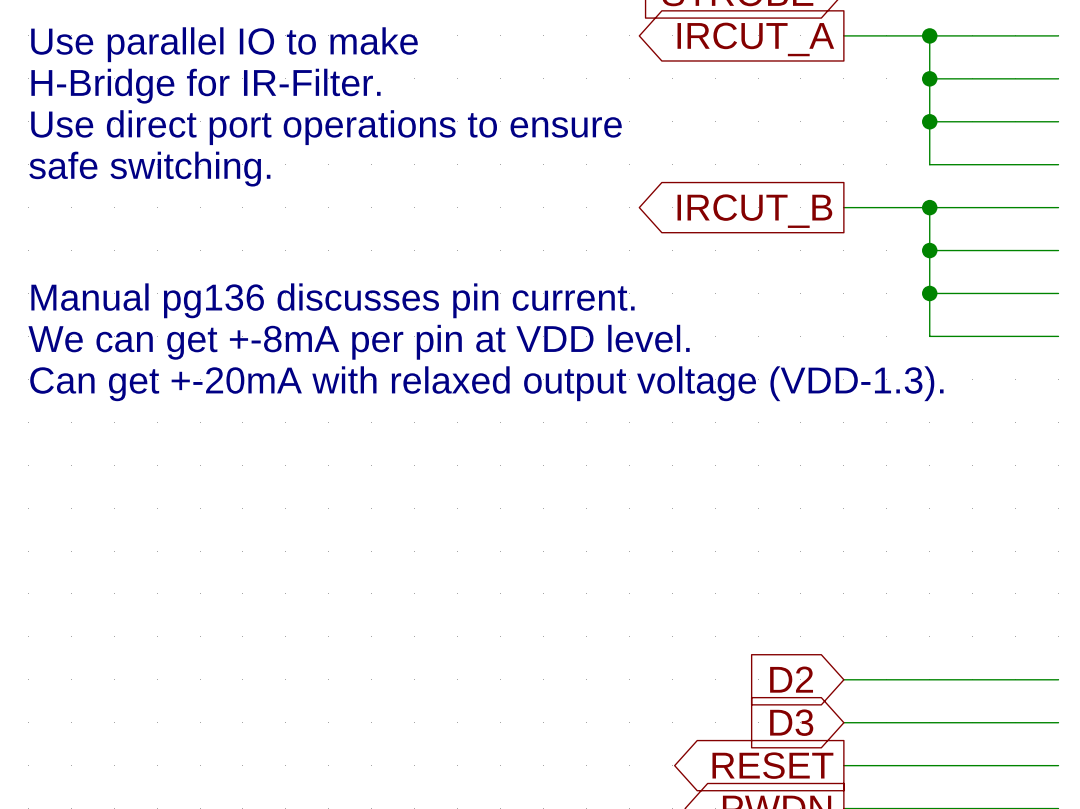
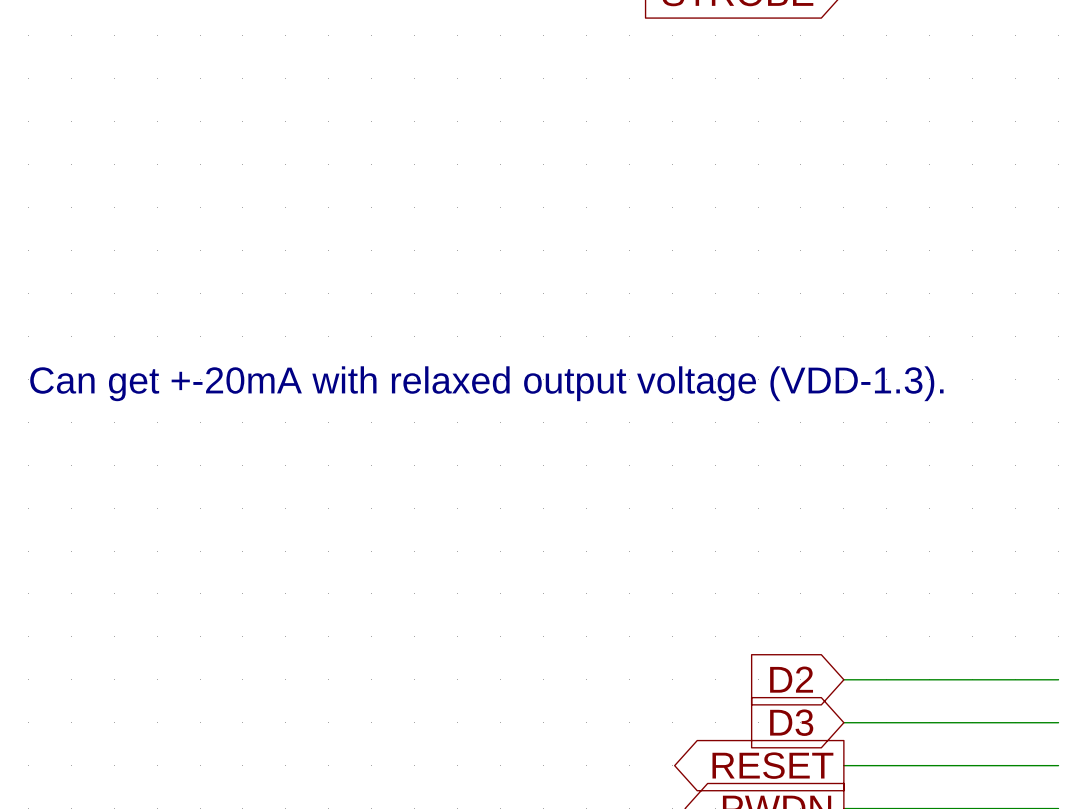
wire: (843, 35) (1058, 35) -> none
wire: (929, 35) (929, 164) (1058, 164) -> none
junction: (929, 35) -> none
global label: IRCUT_A (755, 39) -> none
text: Use parallel IO to make (224, 44) -> none
wire: (929, 78) (1058, 78) -> none
junction: (929, 78) -> none
text: H-Bridge for IR-Filter. (205, 86) -> none
wire: (929, 121) (1058, 121) -> none
junction: (929, 121) -> none
text: Use direct port operations to ensure (326, 127) -> none
text: safe switching. (149, 169) -> none
wire: (843, 207) (1058, 207) -> none
wire: (929, 207) (929, 336) (1058, 336) -> none
junction: (929, 207) -> none
global label: IRCUT_B (754, 211) -> none
wire: (929, 250) (1058, 250) -> none
junction: (929, 250) -> none
wire: (929, 293) (1058, 293) -> none
junction: (929, 293) -> none
text: Manual pg136 discusses pin current. (333, 300) -> none
text: We can get +-8mA per pin at VDD level. (359, 342) -> none

